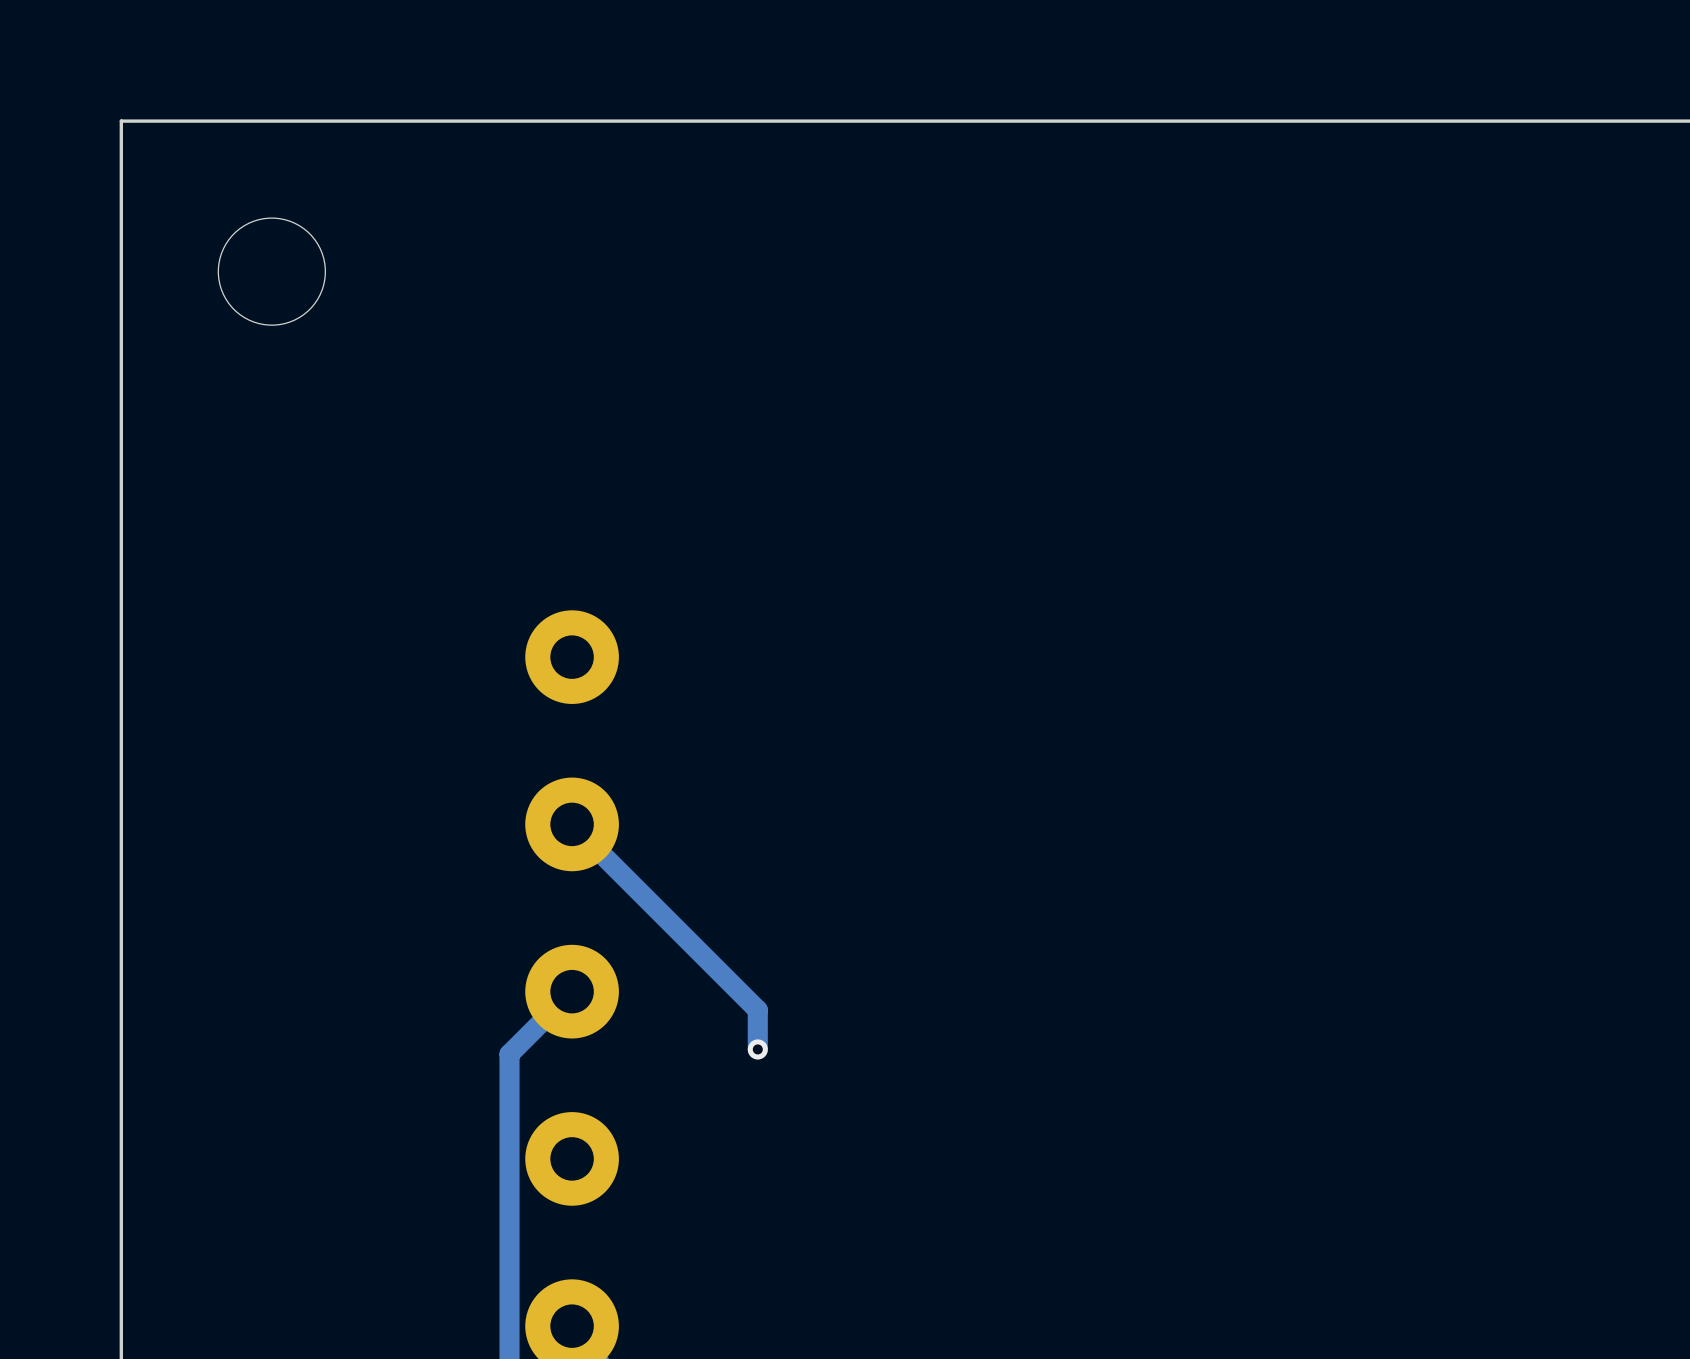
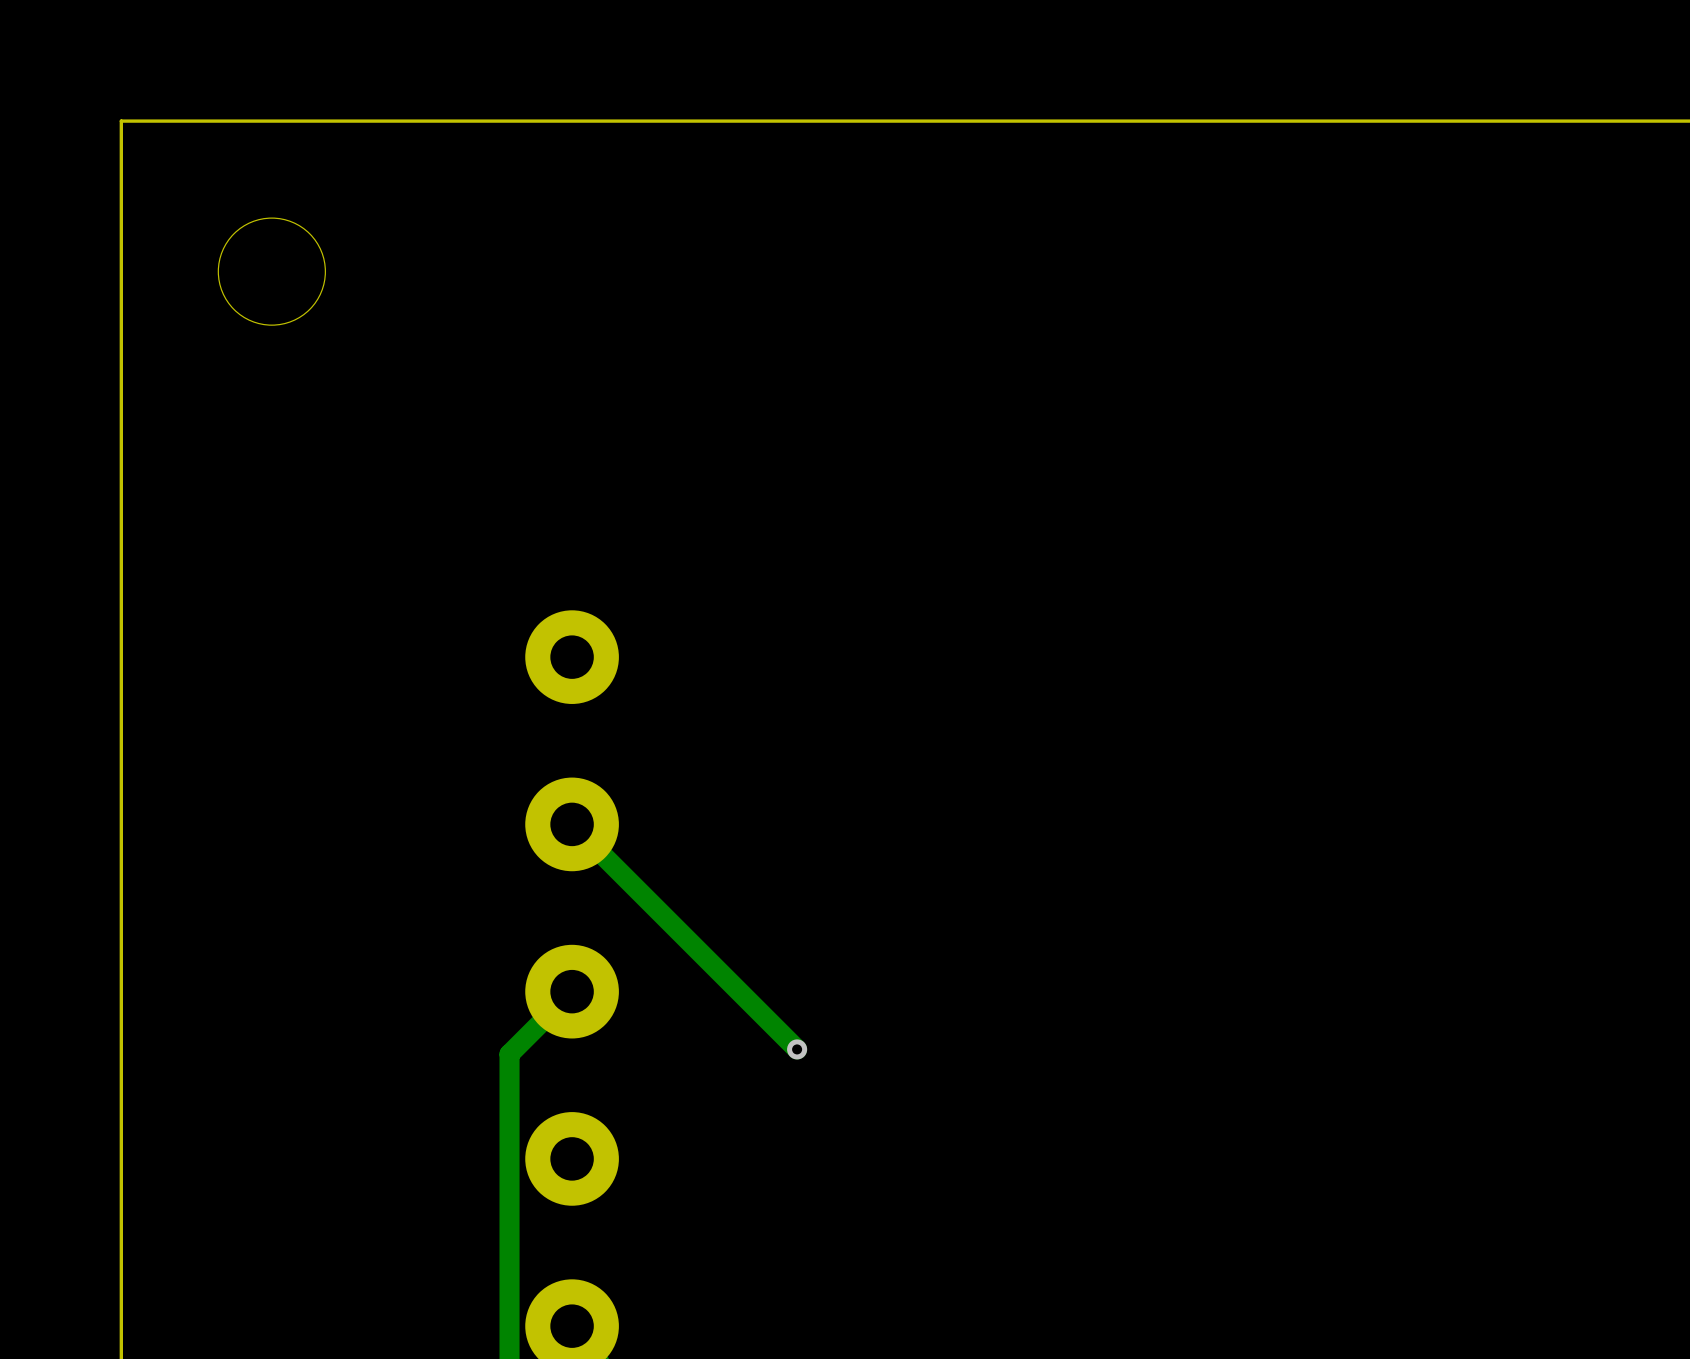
track: (757, 1010) (757, 1049) -> (757, 1010) (797, 1049)
via position: (757, 1049) -> (797, 1049)

